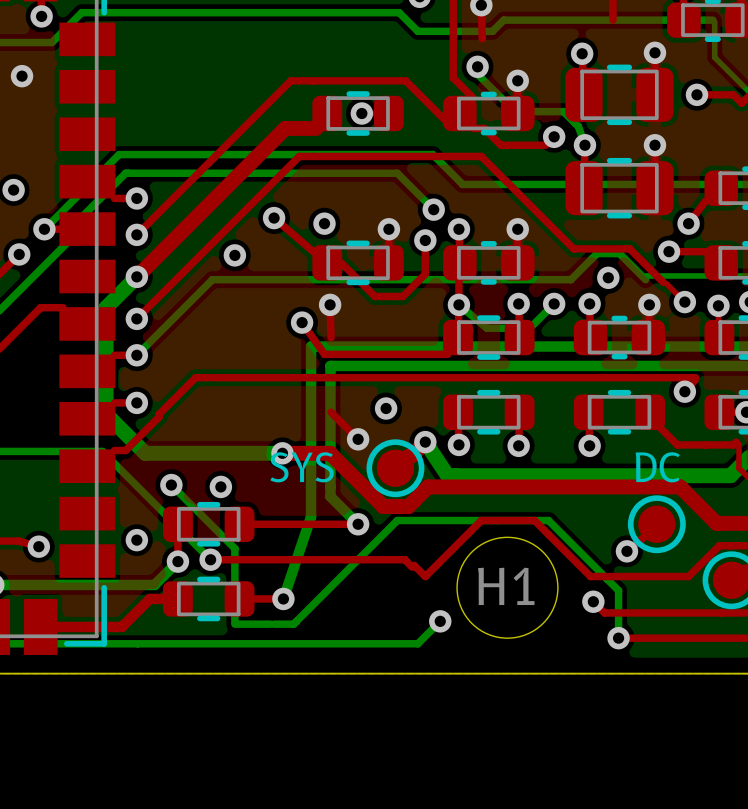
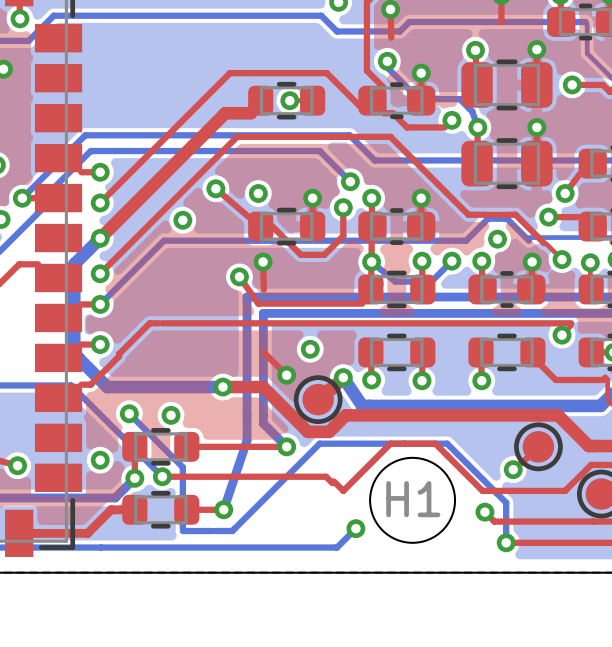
text: SYS (302, 467) -> none
text: DC (657, 467) -> none

